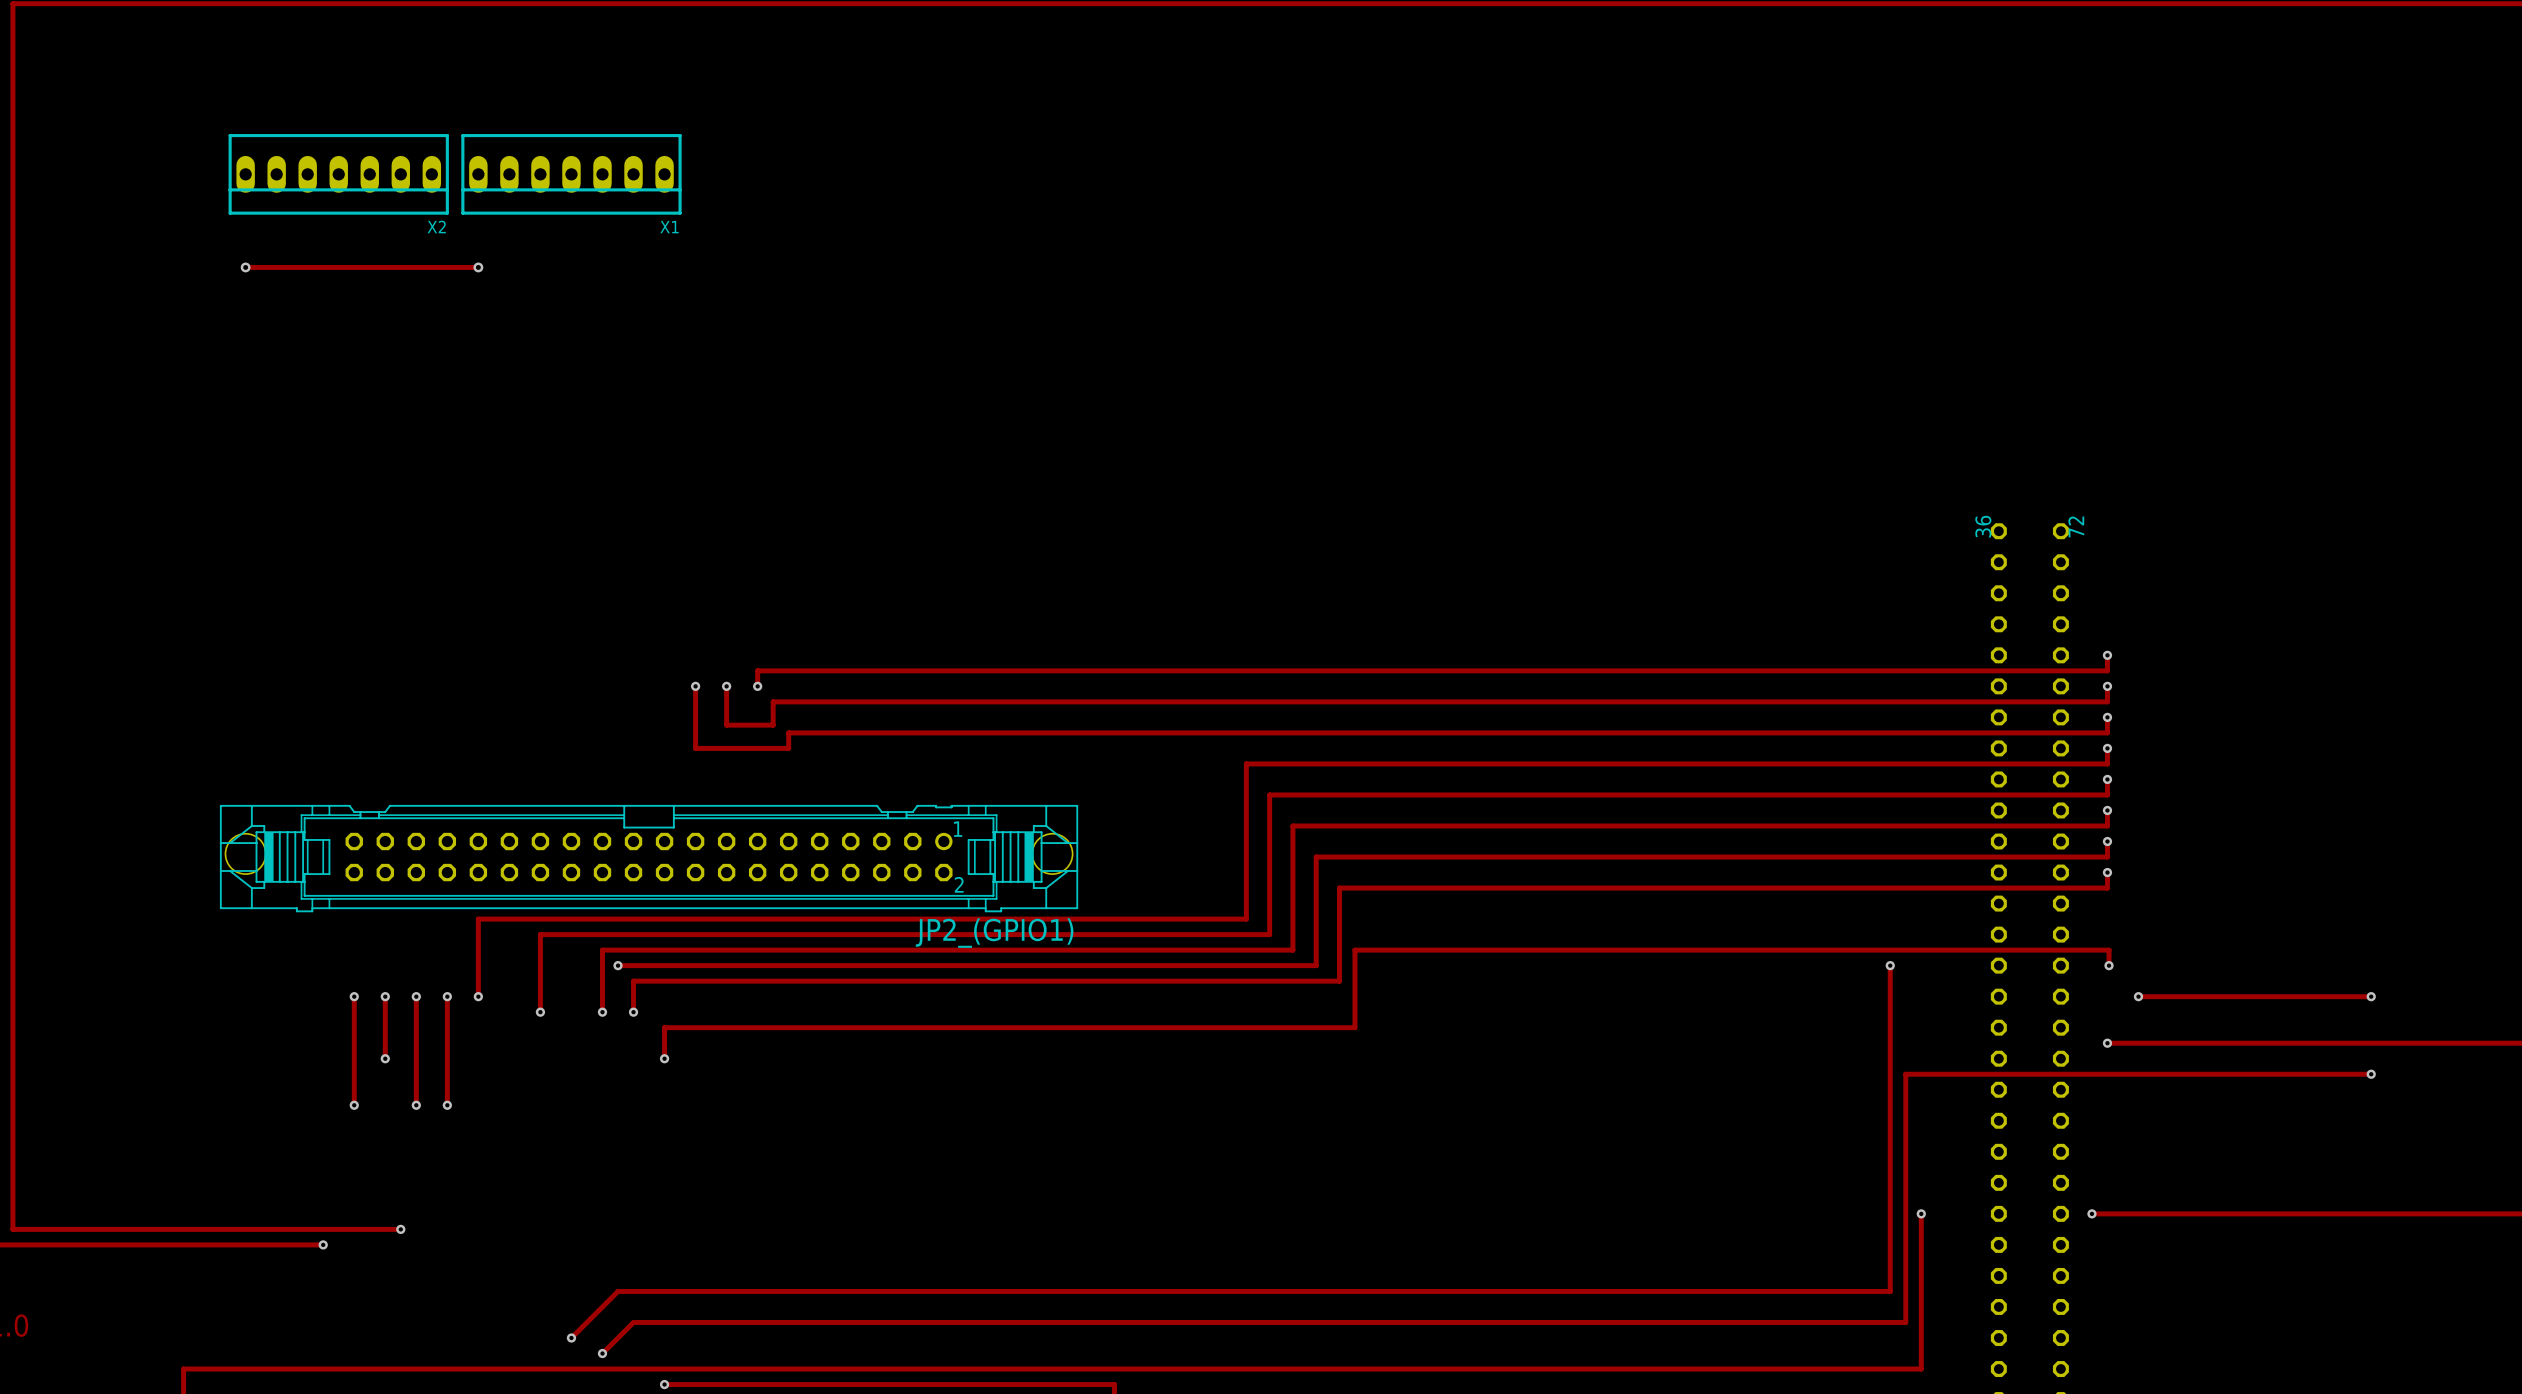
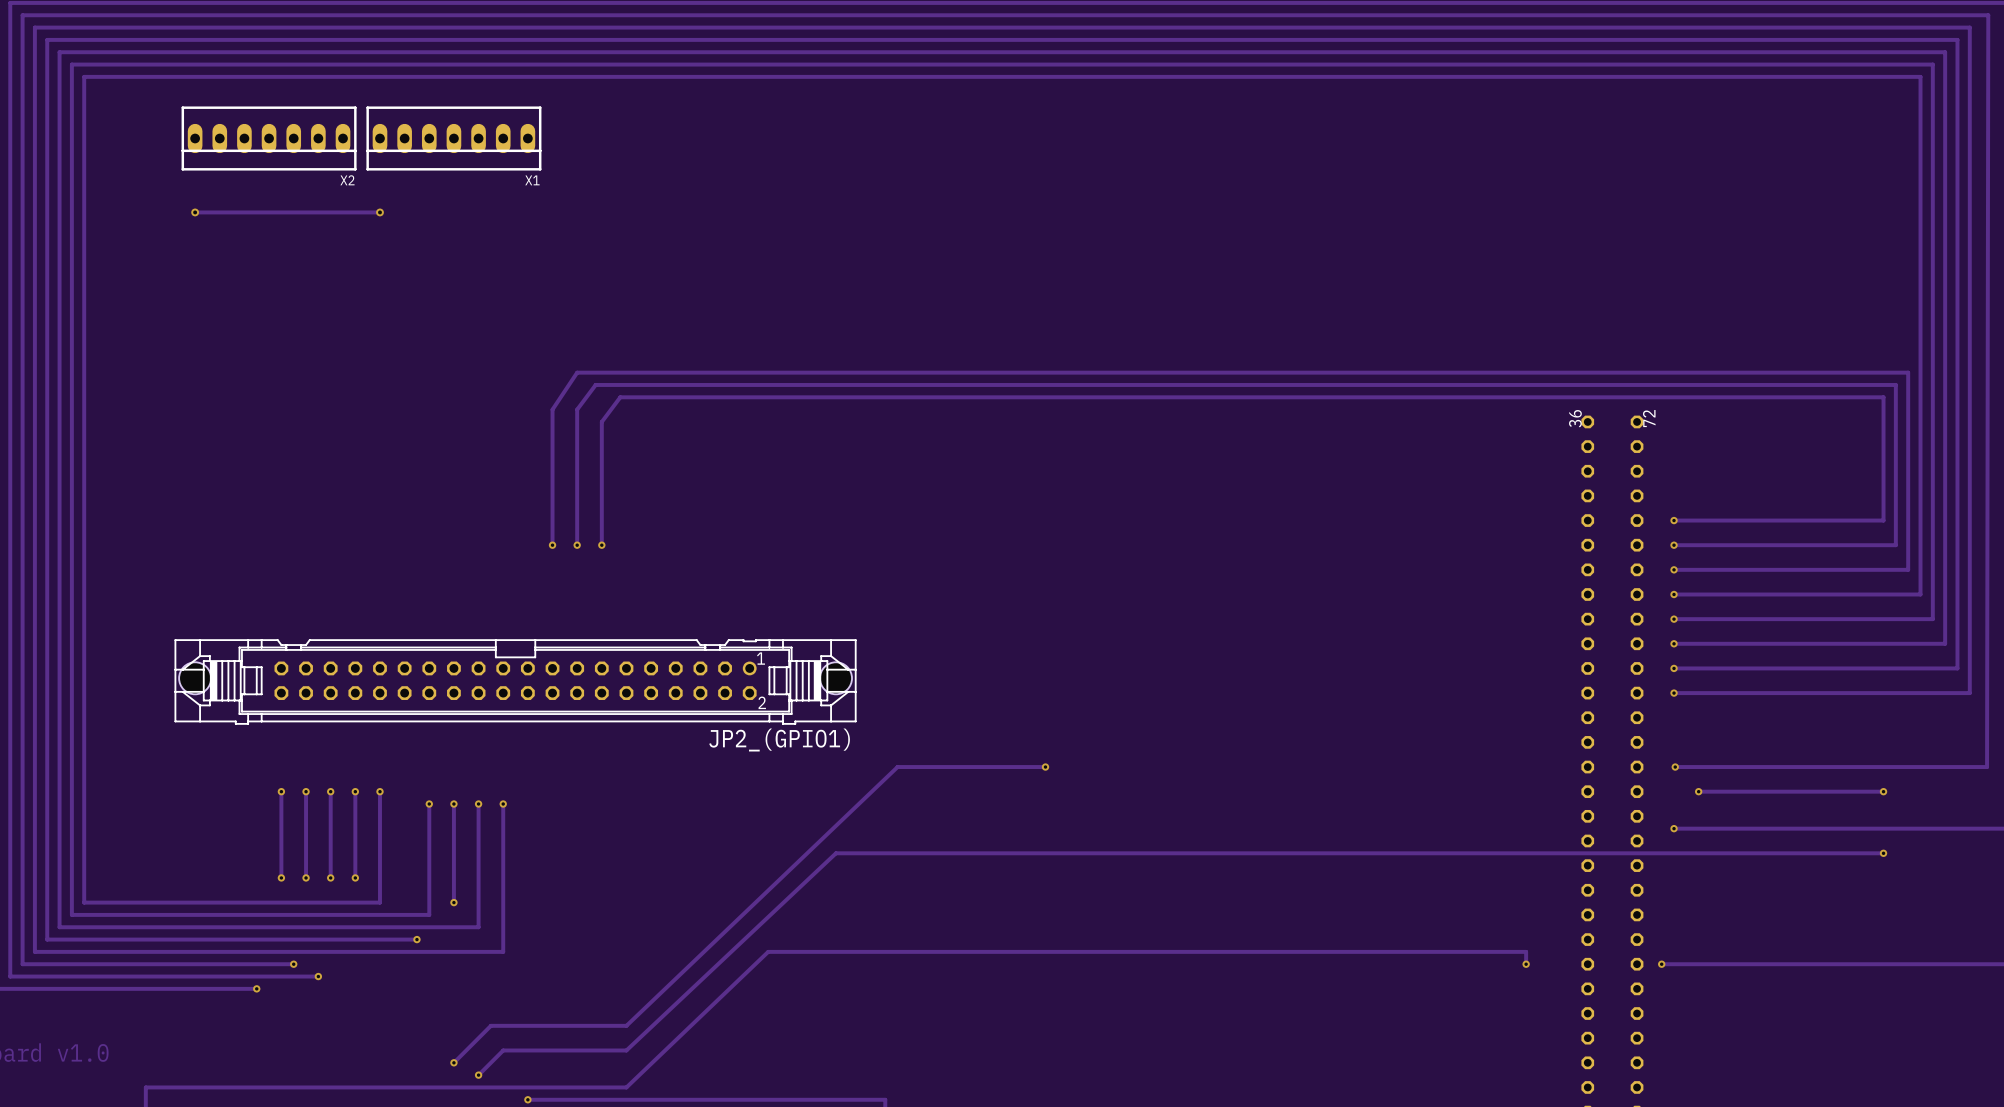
track: (2107, 655) (2107, 670) (757, 670) -> (1674, 520) (1883, 520) (1883, 397) (620, 397) (601, 421) (601, 532)
track: (695, 686) (695, 748) (788, 748) (788, 732) (2107, 732) (2107, 717) -> (552, 545) (552, 409) (577, 372) (1908, 372) (1908, 569) (1674, 569)
track: (726, 686) (726, 725) (773, 725) (773, 701) (2107, 701) (2107, 686) -> (577, 545) (577, 409) (595, 384) (1895, 384) (1895, 545) (1674, 545)
track: (2107, 748) (2107, 763) (1246, 763) (1246, 919) (478, 919) (478, 996) -> (1674, 594) (1920, 594) (1920, 76) (84, 76) (84, 902) (379, 902) (379, 791)
track: (2107, 779) (2107, 794) (1269, 794) (1269, 934) (540, 934) (540, 1012) -> (1674, 619) (1932, 619) (1932, 64) (71, 64) (71, 914) (429, 914) (429, 804)
track: (2107, 810) (2107, 826) (1292, 826) (1292, 950) (602, 950) (602, 1012) -> (1674, 643) (1945, 643) (1945, 52) (59, 52) (59, 927) (478, 927) (478, 804)
track: (2107, 841) (2107, 857) (1316, 857) (1316, 965) -> (1674, 668) (1957, 668) (1957, 39) (47, 39) (47, 939) (416, 939)
track: (2107, 872) (2107, 888) (1339, 888) (1339, 981) (633, 981) (633, 1012) -> (1674, 693) (1969, 693) (1969, 27) (34, 27) (34, 951) (503, 951) (503, 804)
track: (618, 965) (1130, 965) -> (626, 1025) (897, 767)
via: (618, 965) -> none
via: none -> (1045, 767)
track: (1890, 965) (1890, 1291) (788, 1291) -> none
via: (1890, 965) -> none
track: (2109, 965) (2109, 950) (1354, 950) (1354, 1027) (664, 1027) (664, 1058) -> (1675, 767) (1987, 767) (1988, 15) (22, 15) (22, 964) (293, 964)
track: none -> (453, 804) (453, 902)
via: none -> (453, 804)
track: none -> (306, 840) (306, 877)
via position: (385, 1058) -> (306, 877)
via: (664, 1058) -> none
track: (1905, 1074) (1905, 1322) (788, 1322) -> (1513, 853) (835, 853) (626, 1050)
via: none -> (453, 902)
via: none -> (416, 939)
via: none -> (293, 964)
track: (1921, 1213) (1921, 1369) (788, 1369) -> (1526, 964) (1526, 951) (768, 951) (626, 1087)

